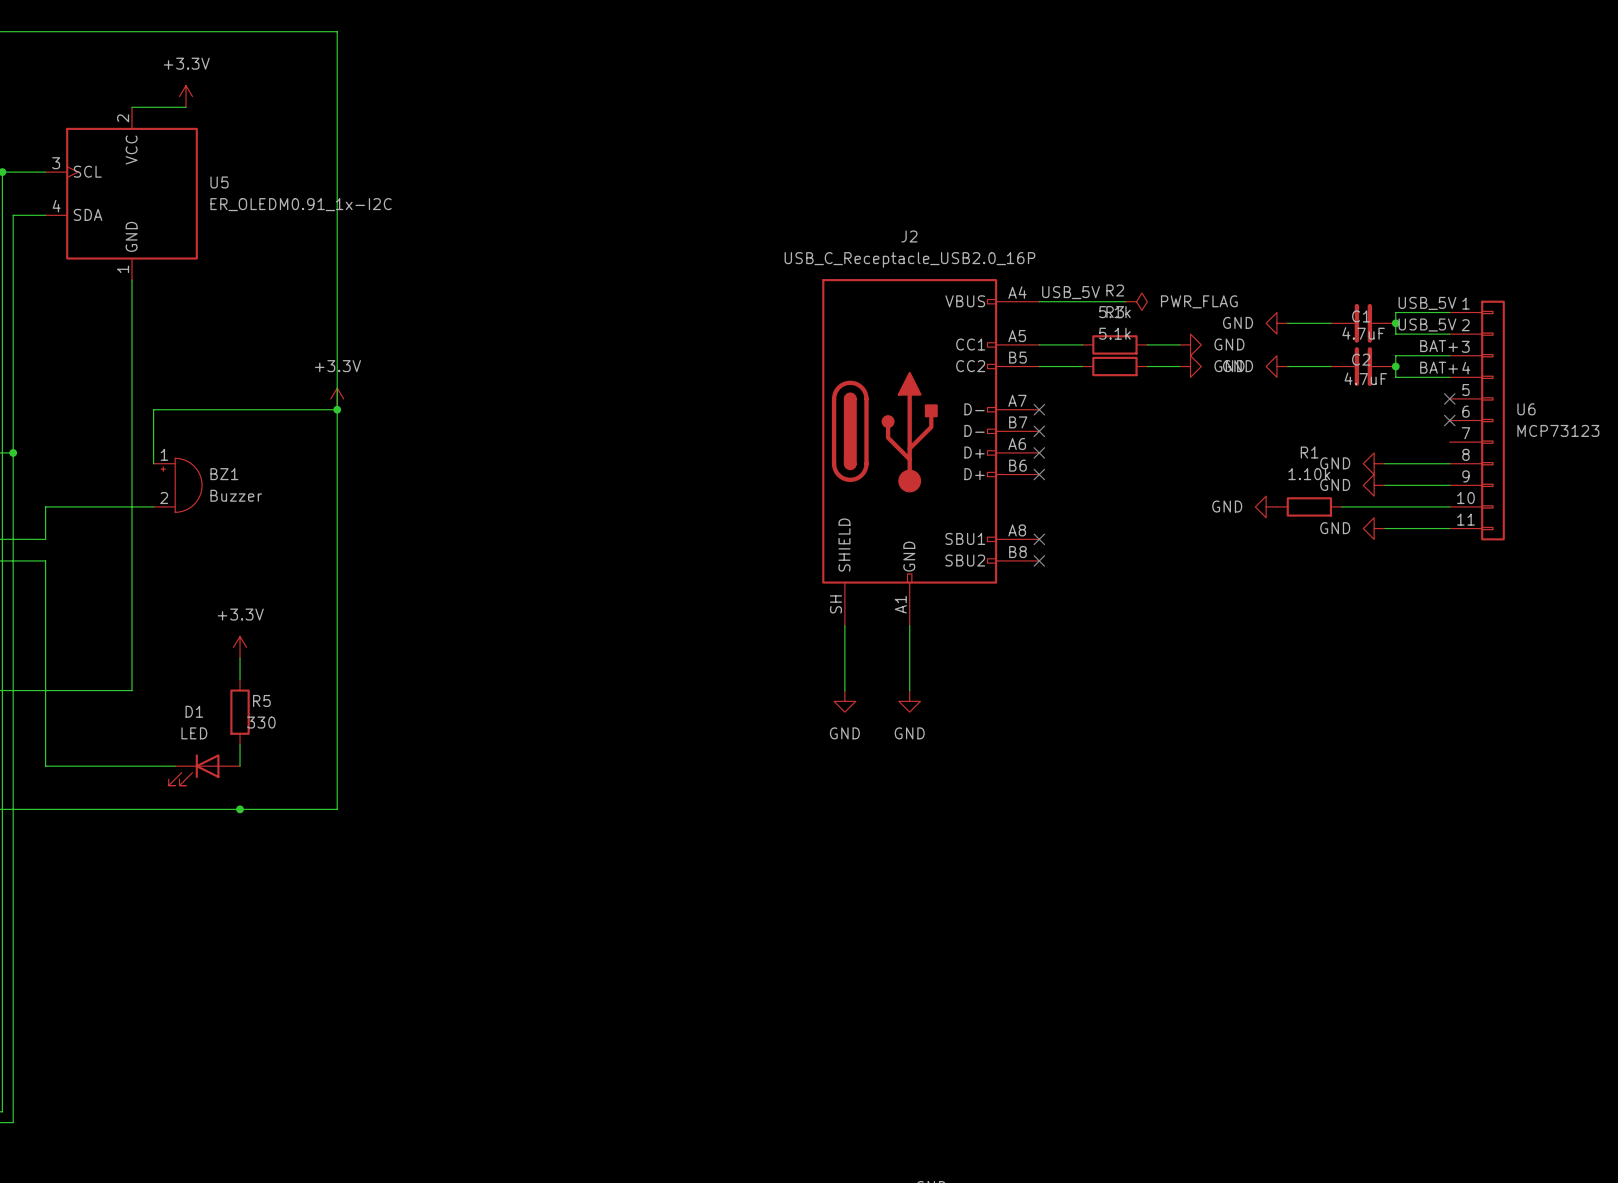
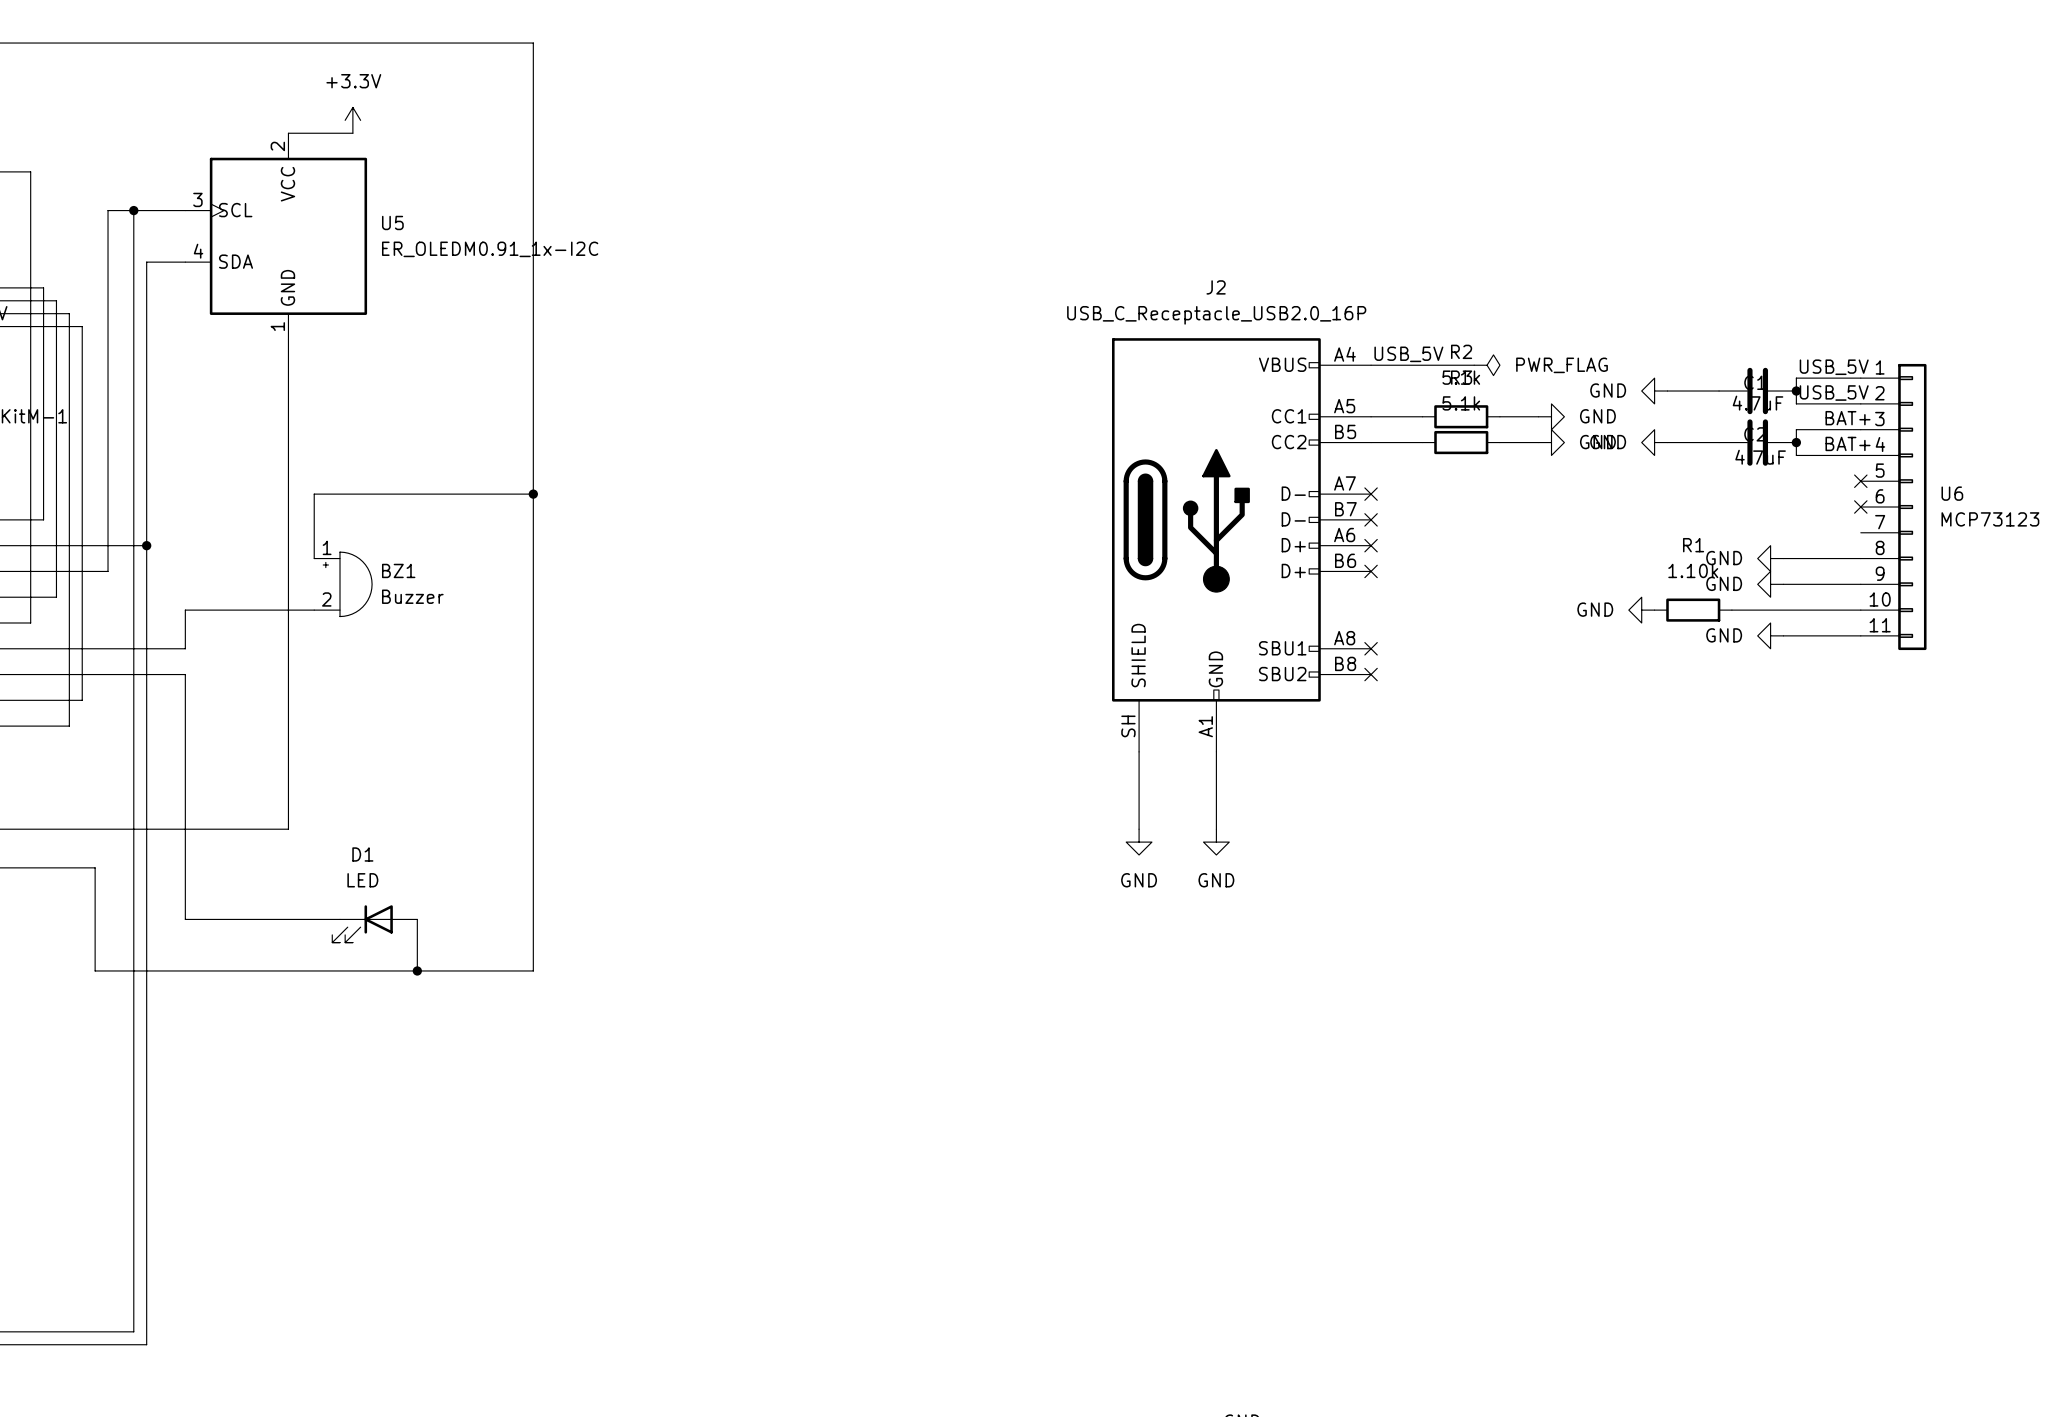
power symbol: +3.3V (337, 398) -> none
power symbol: +3.3V (240, 647) -> none
wire: (240, 658) (240, 679) -> none
R5: 330 (240, 712) -> none
wire: (240, 744) (240, 766) -> (417, 970) (417, 919)

